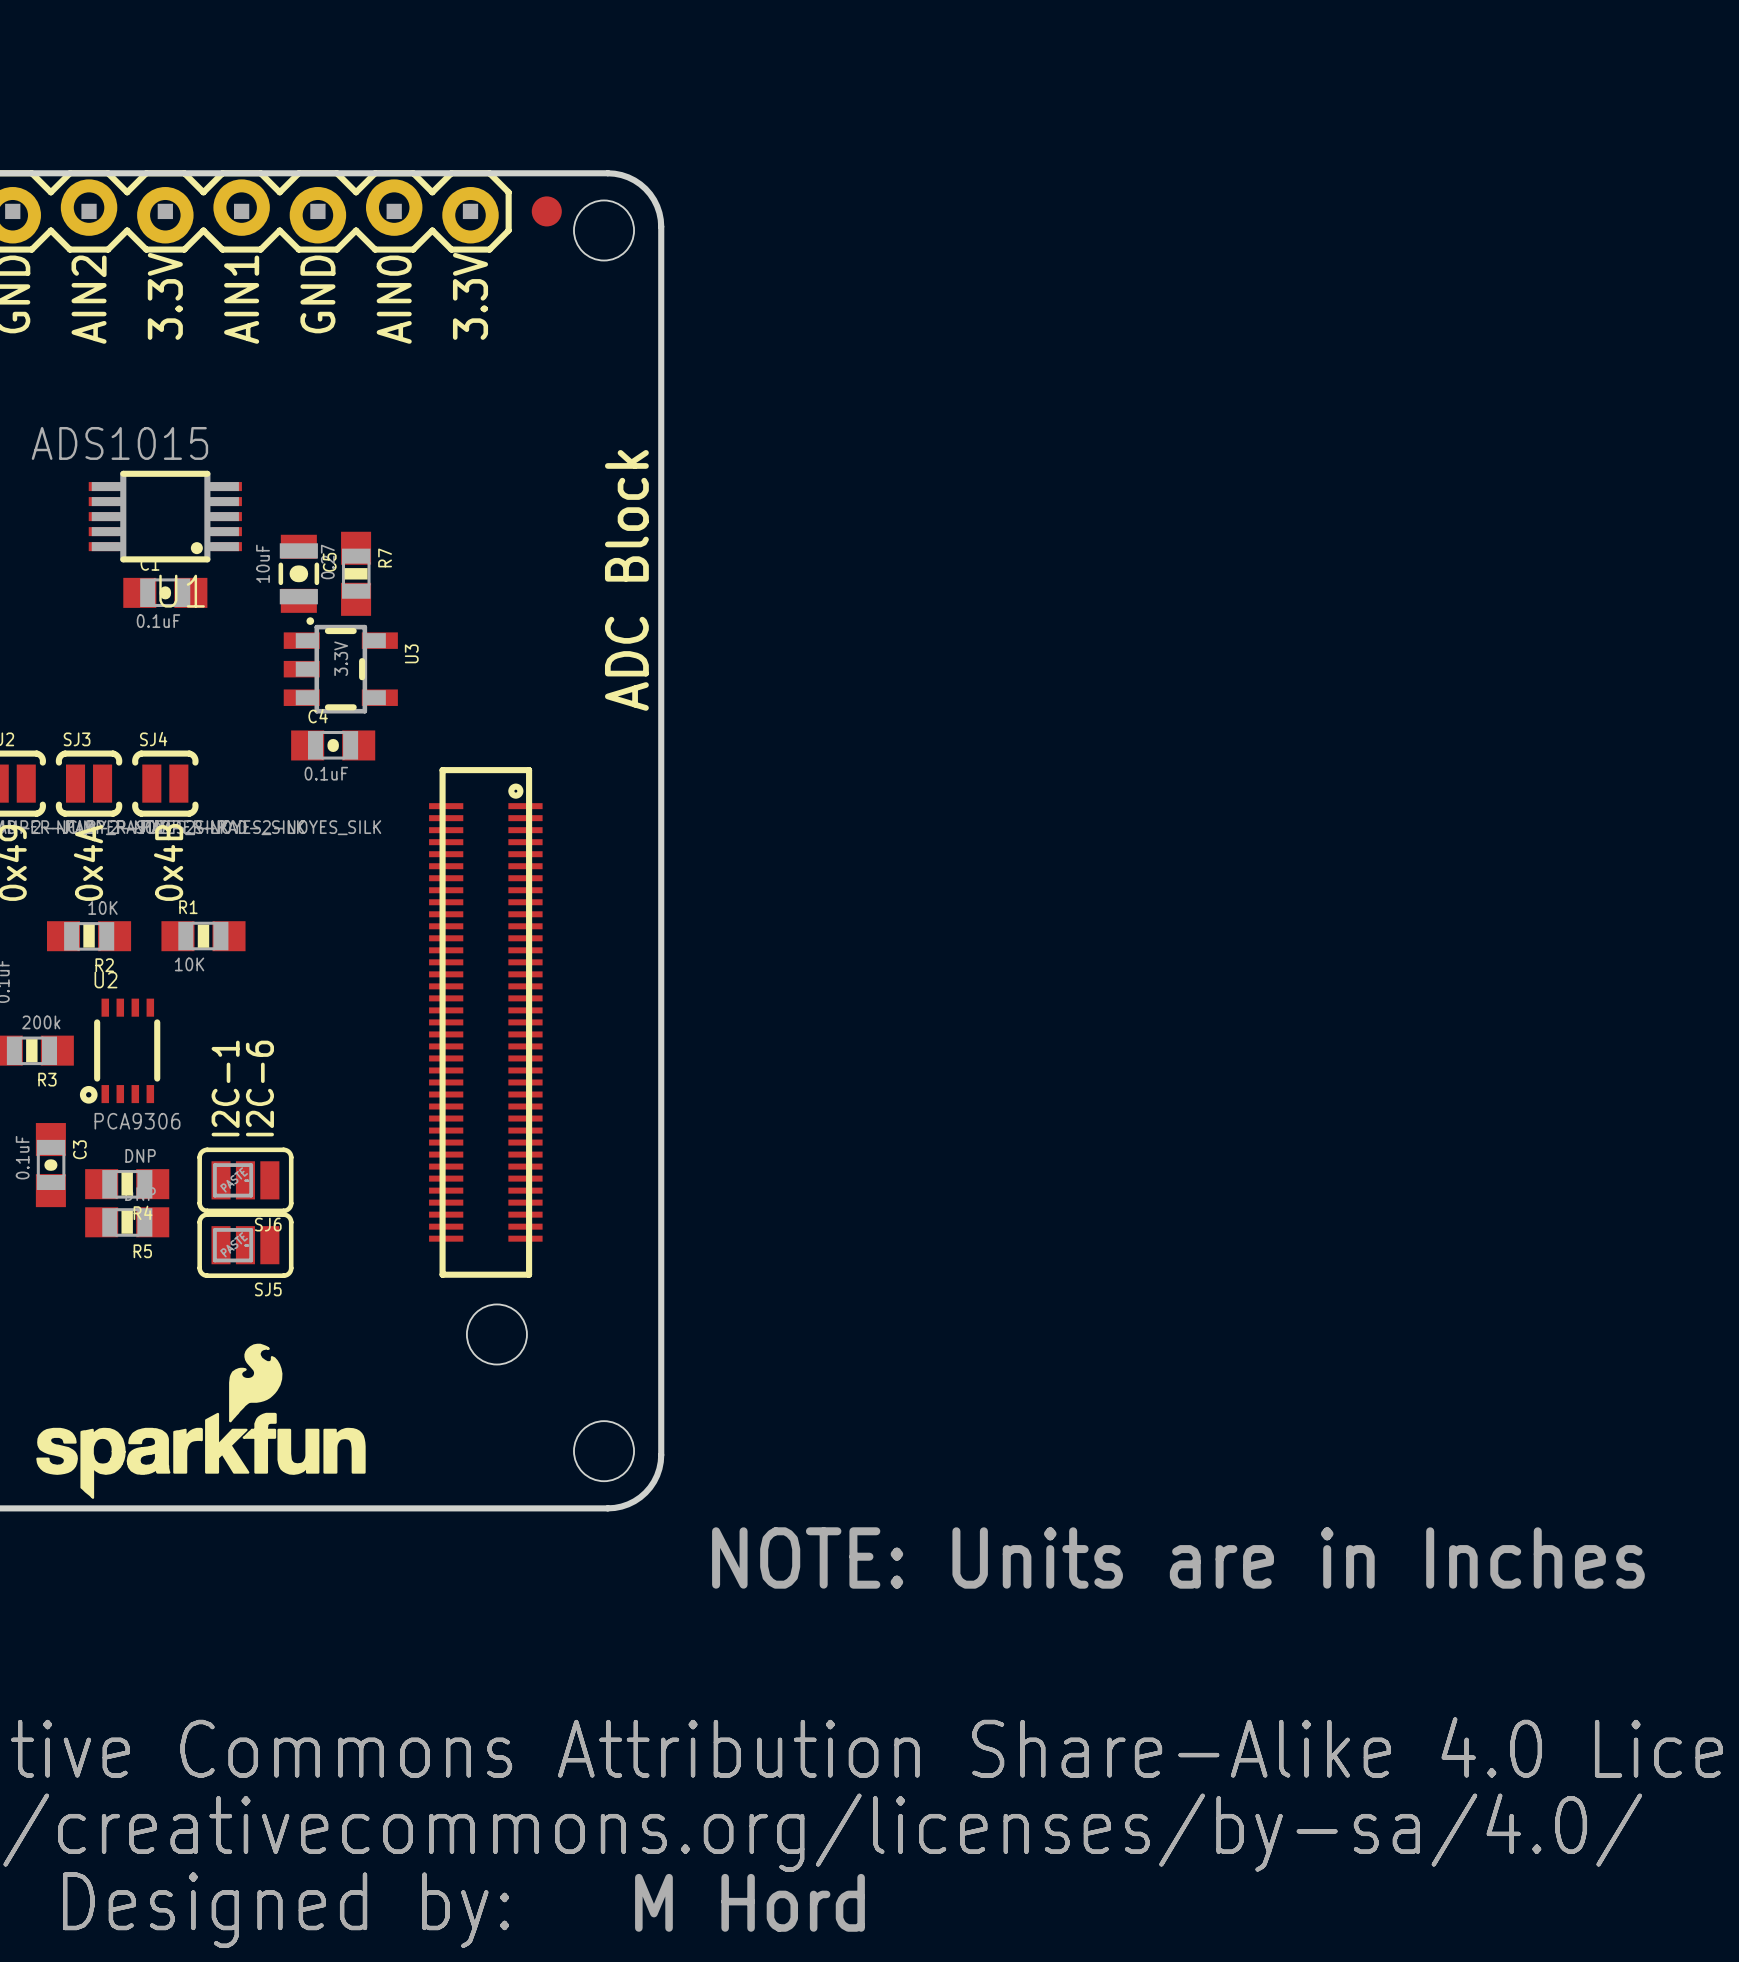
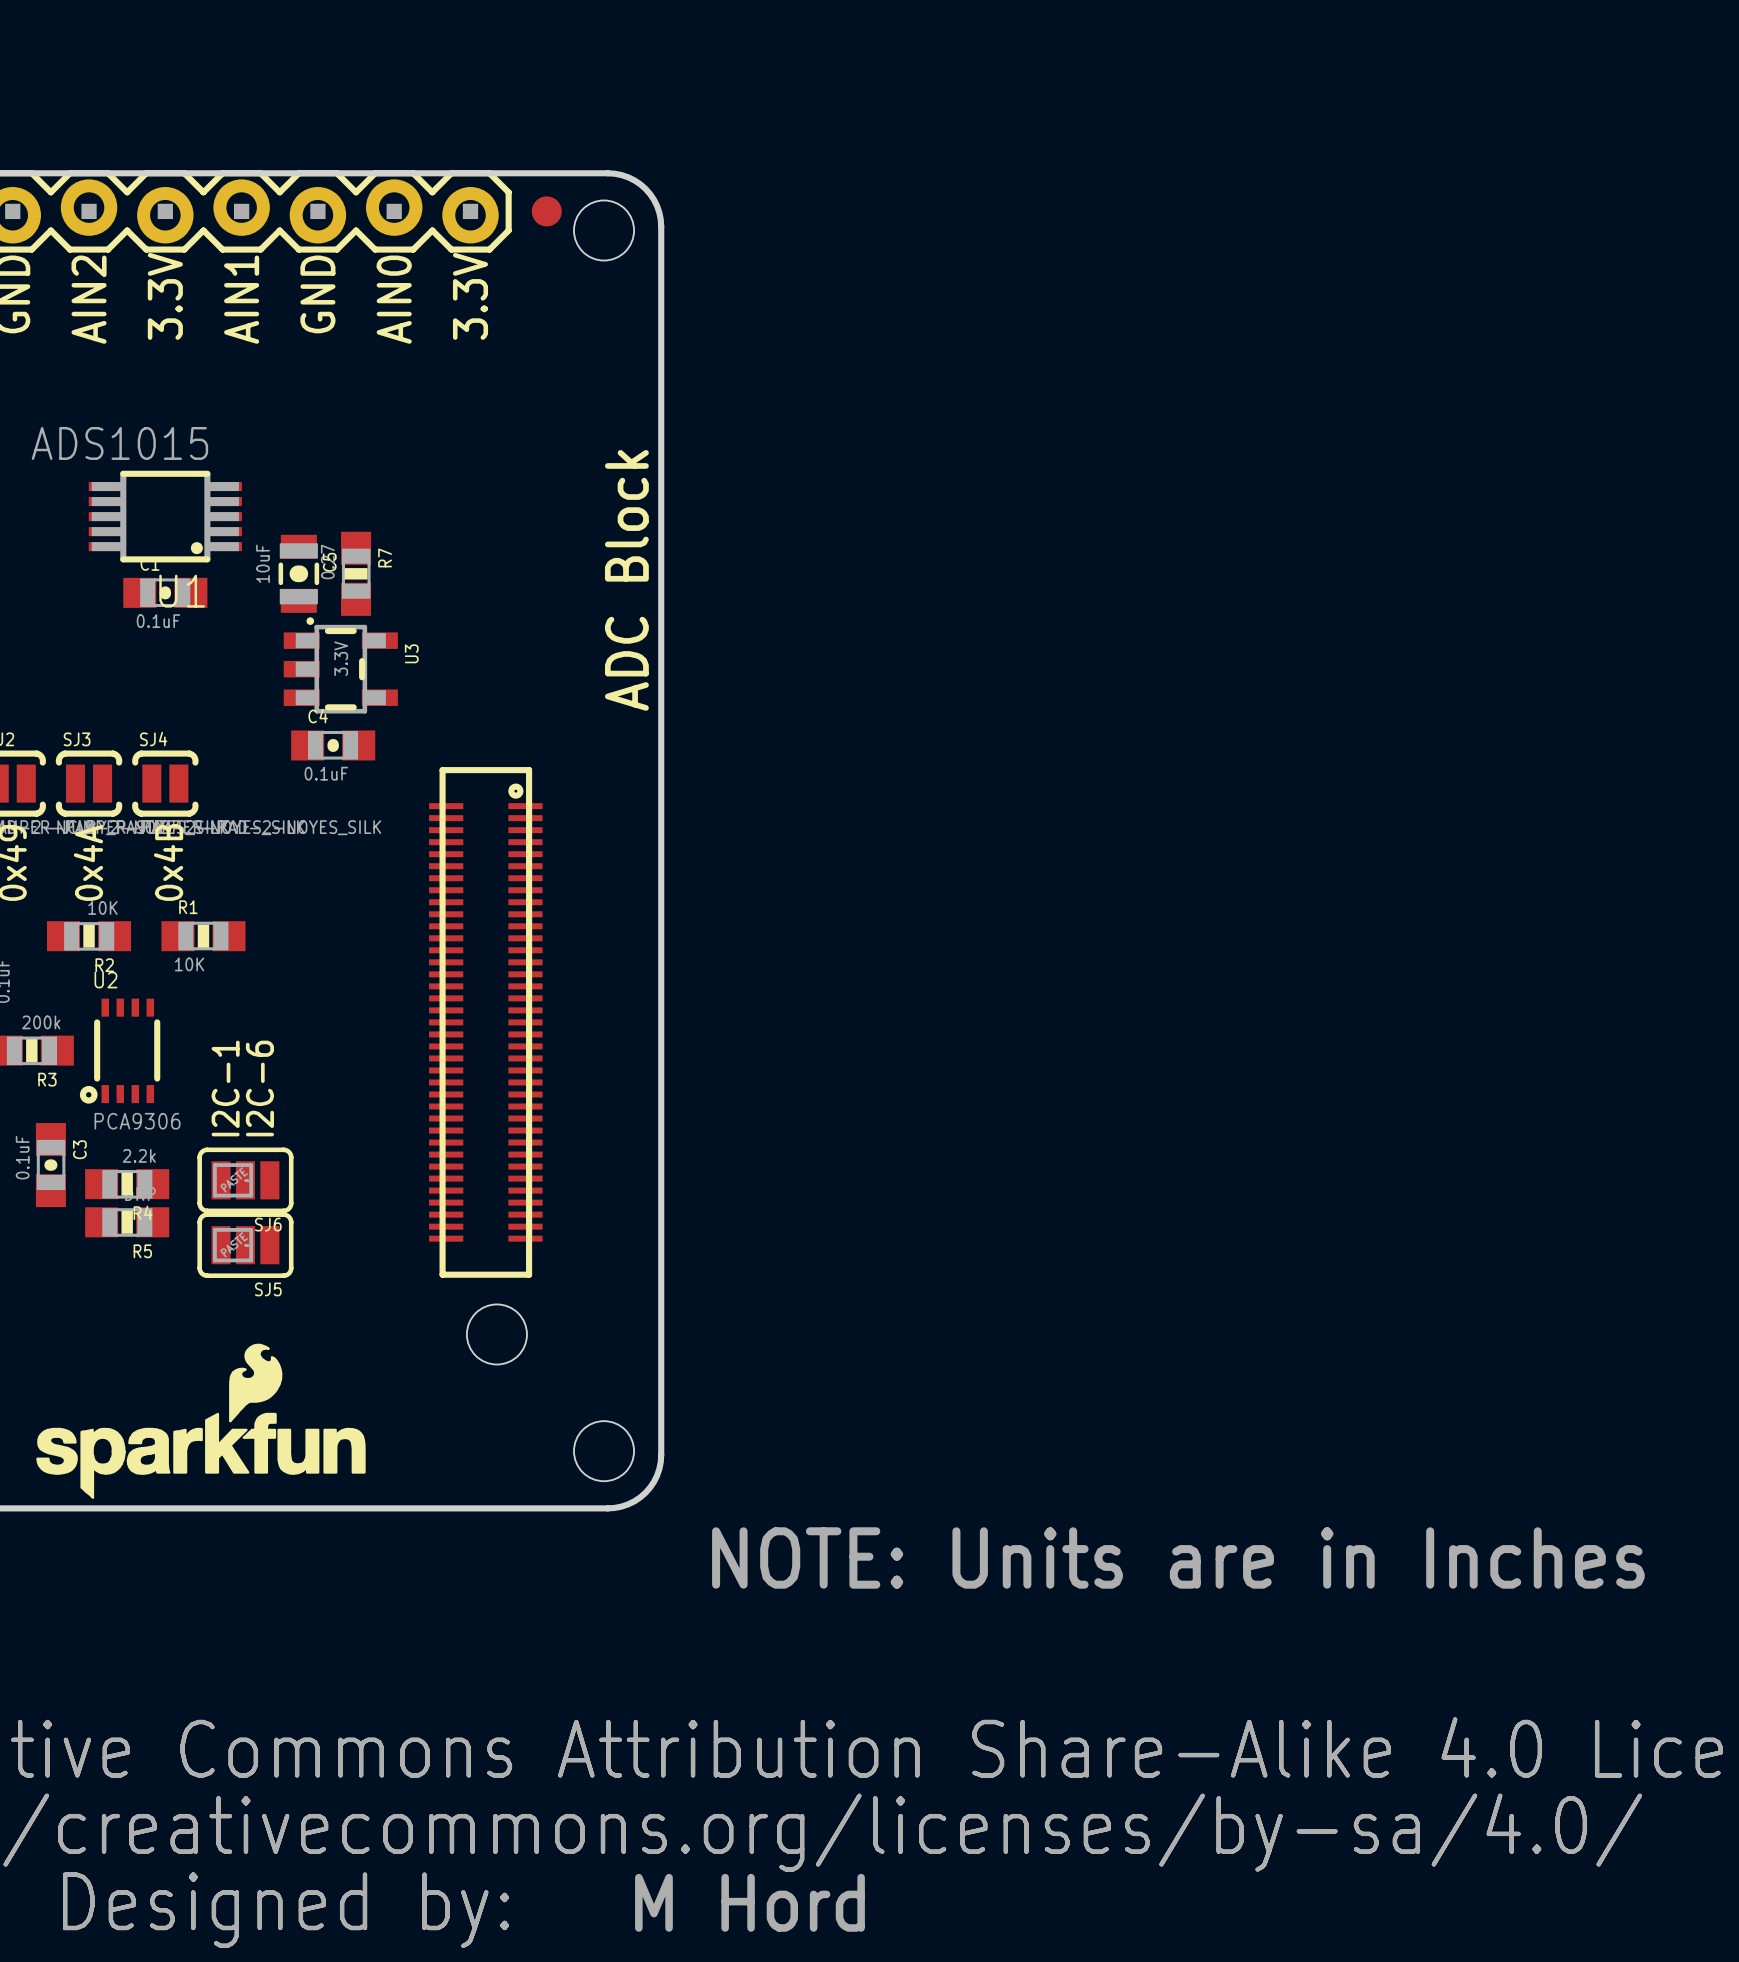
part value: DNP (140, 1155) -> 2.2k (139, 1155)

